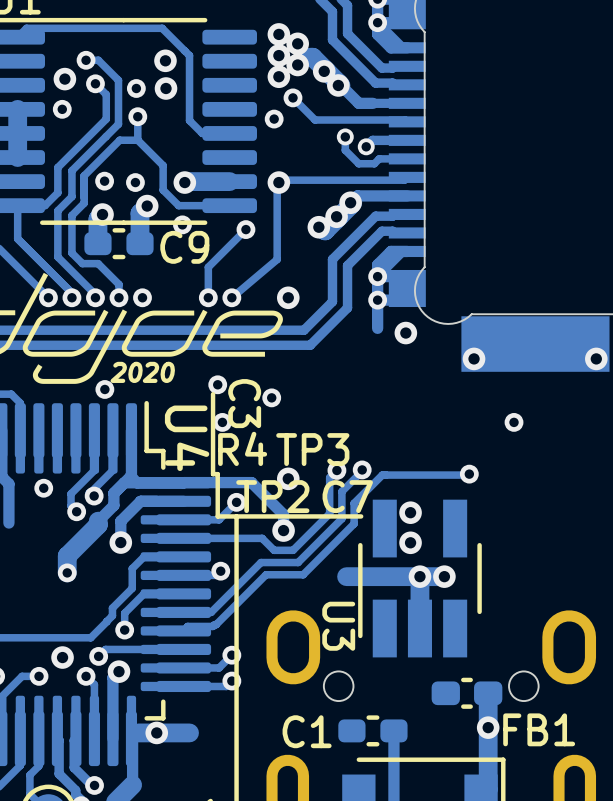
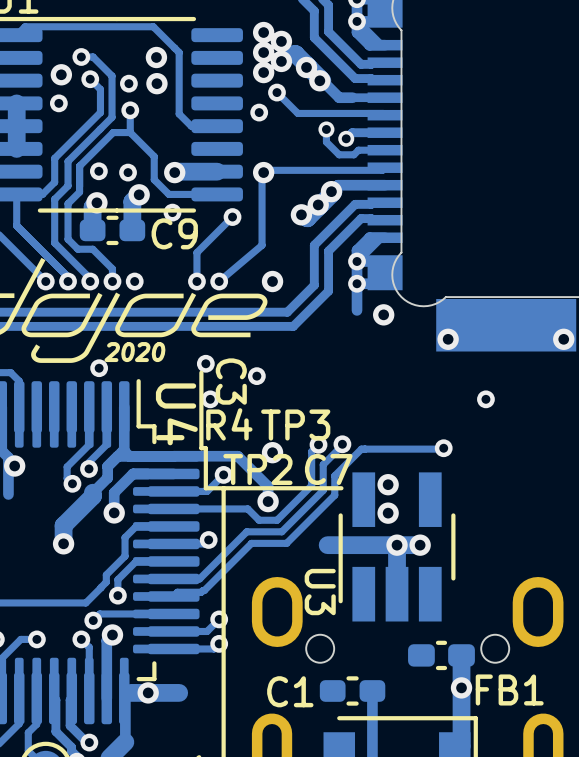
via: (43, 488) -> none
via: none -> (14, 466)
via: (67, 572) -> none
via position: (62, 657) -> (63, 543)

